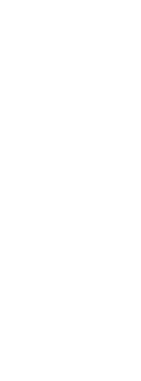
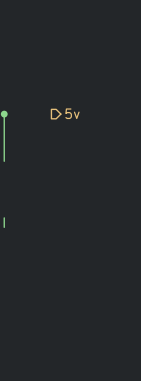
hierarchical label: none -> 5v (72, 113)
wire: none -> (4, 114) (4, 161)
junction: none -> (4, 114)
wire: none -> (4, 217) (4, 227)

